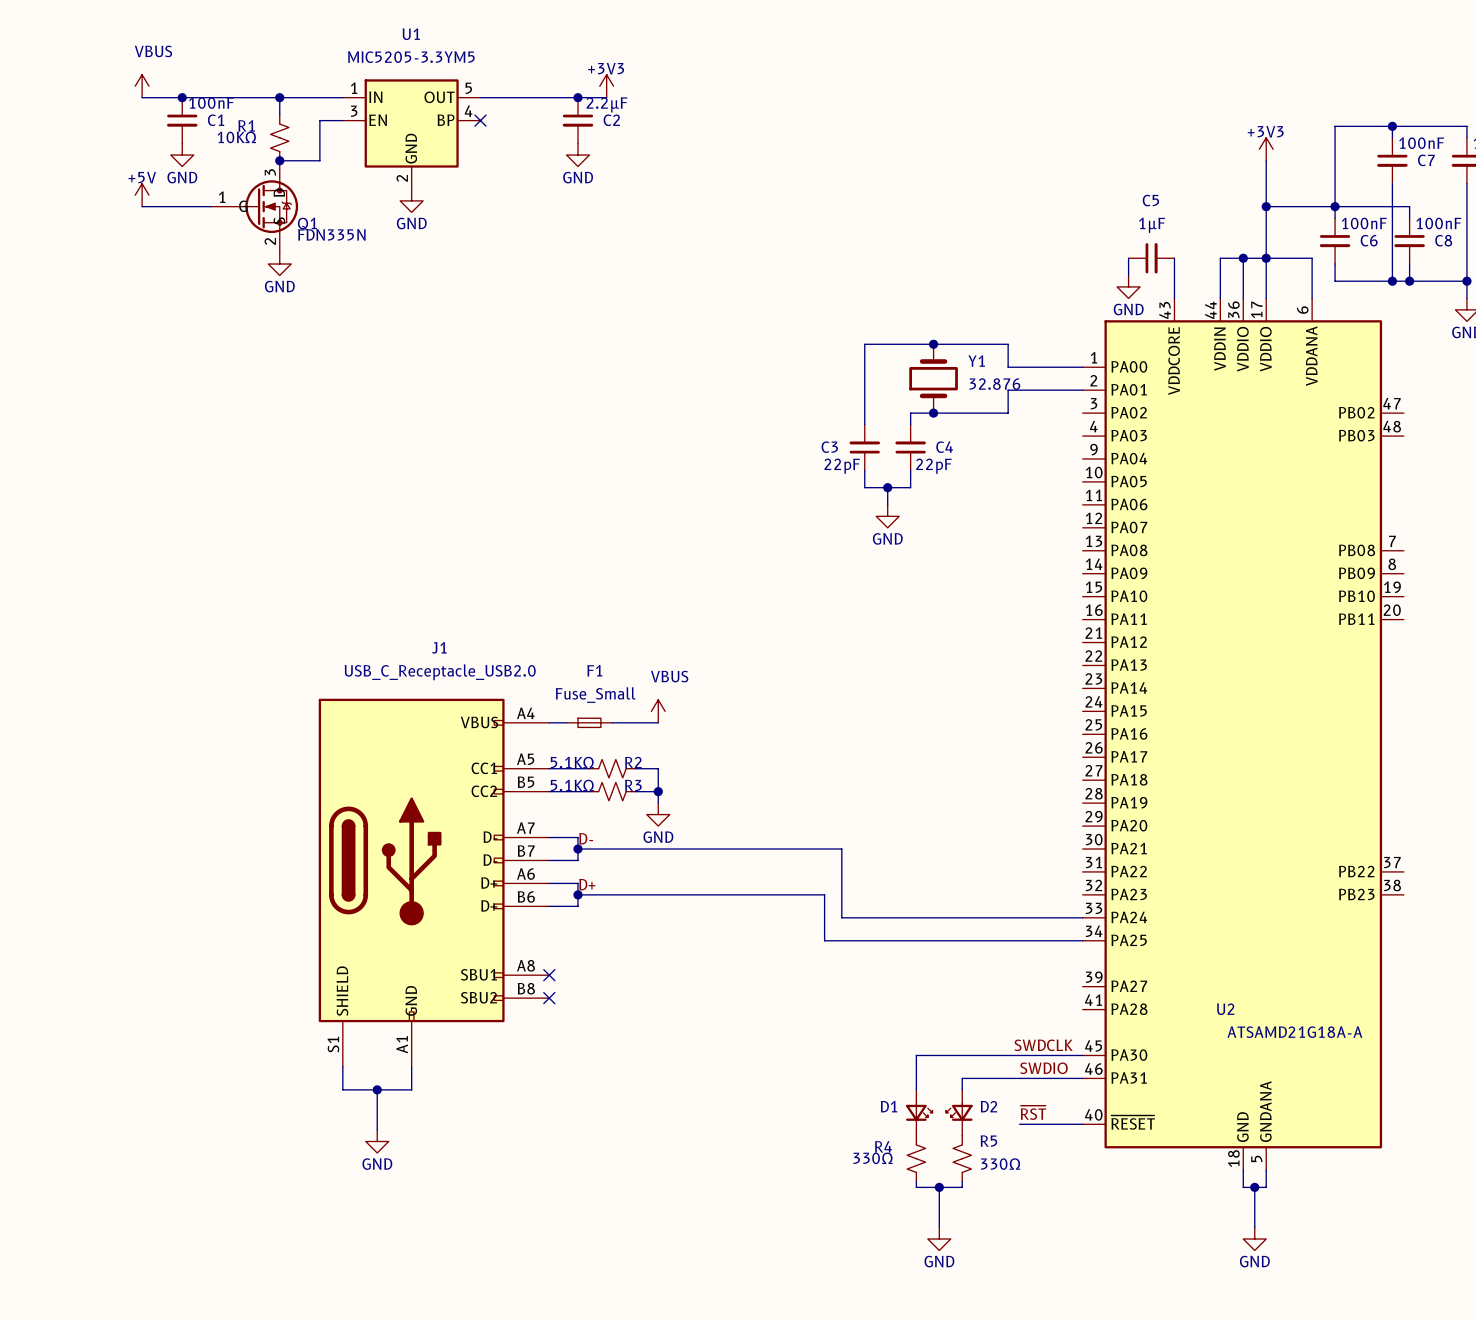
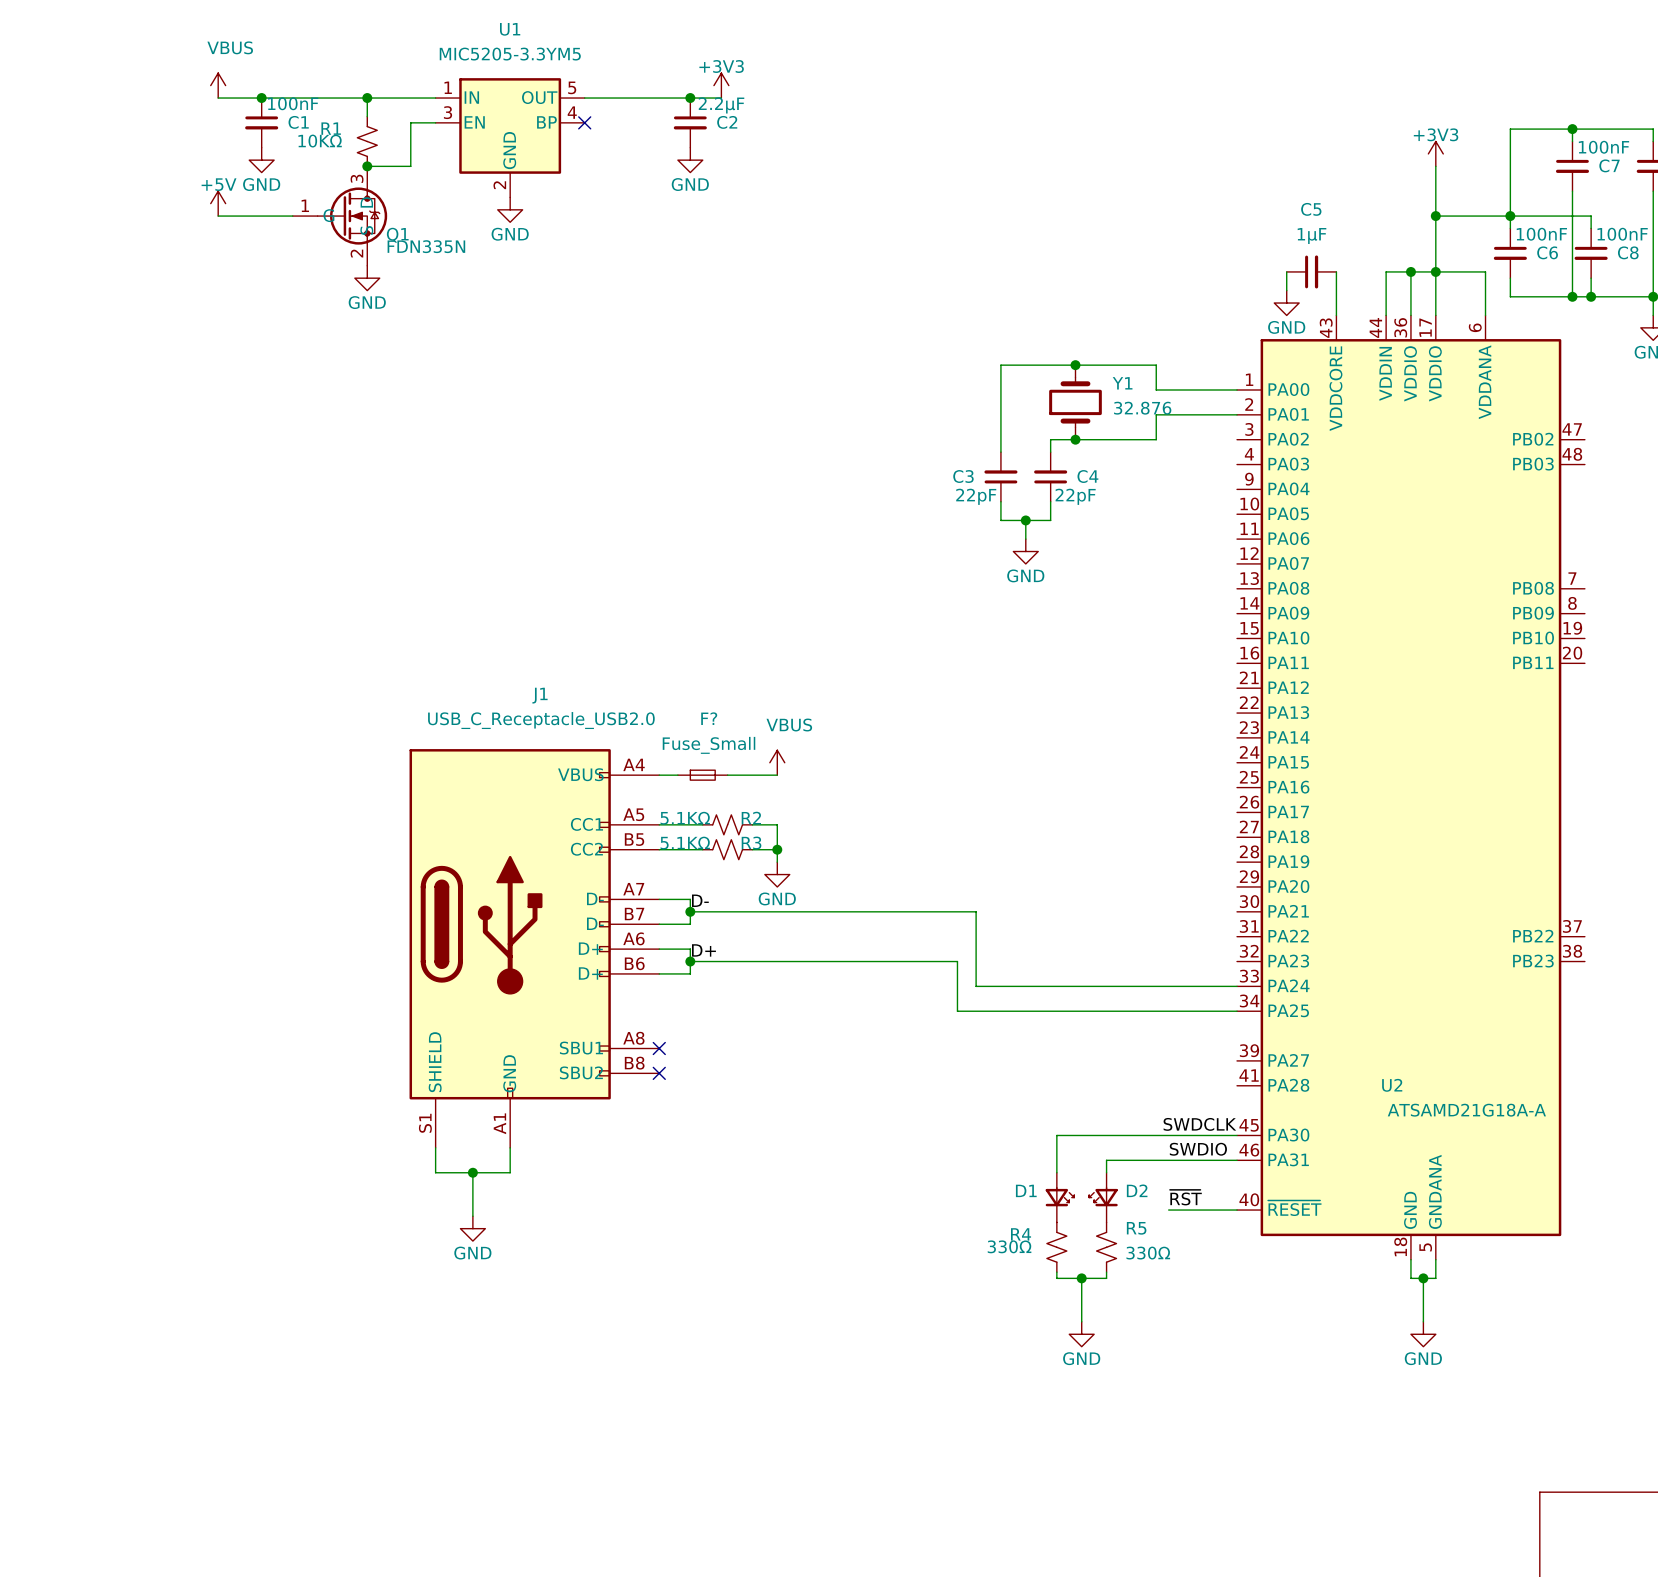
F1 name: F1 (594, 670) -> F? (709, 718)

